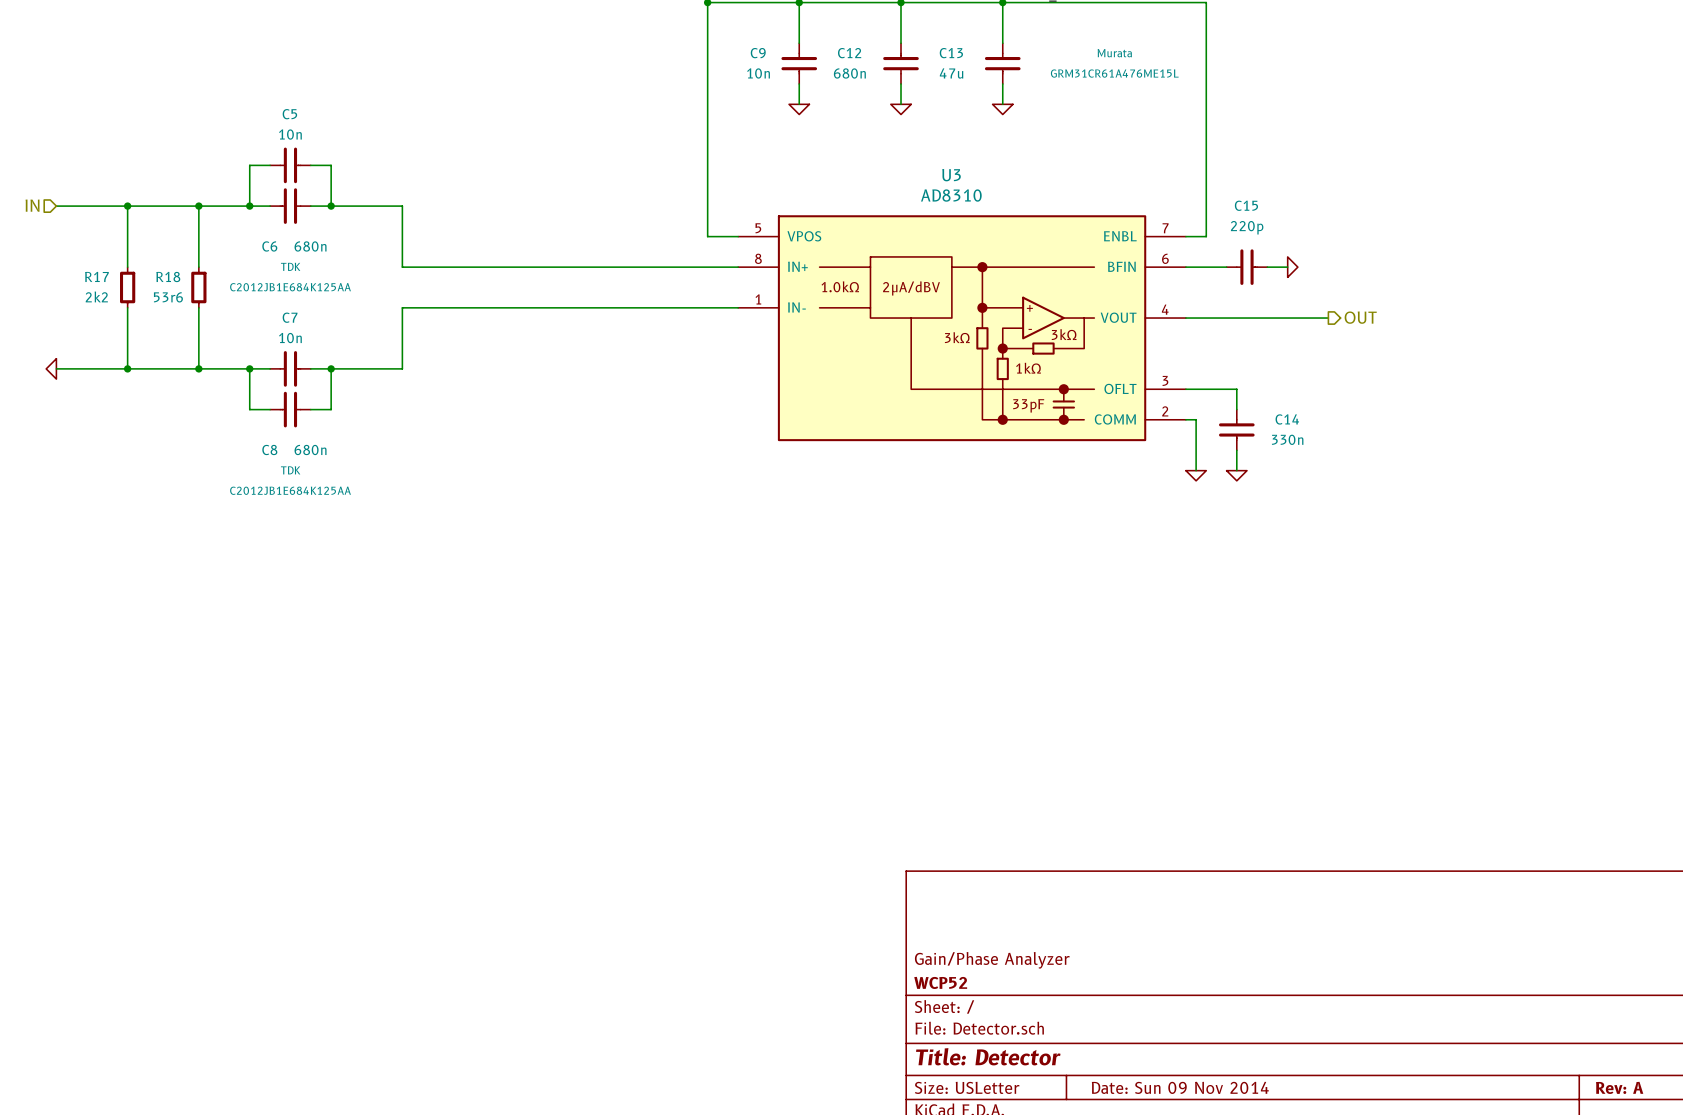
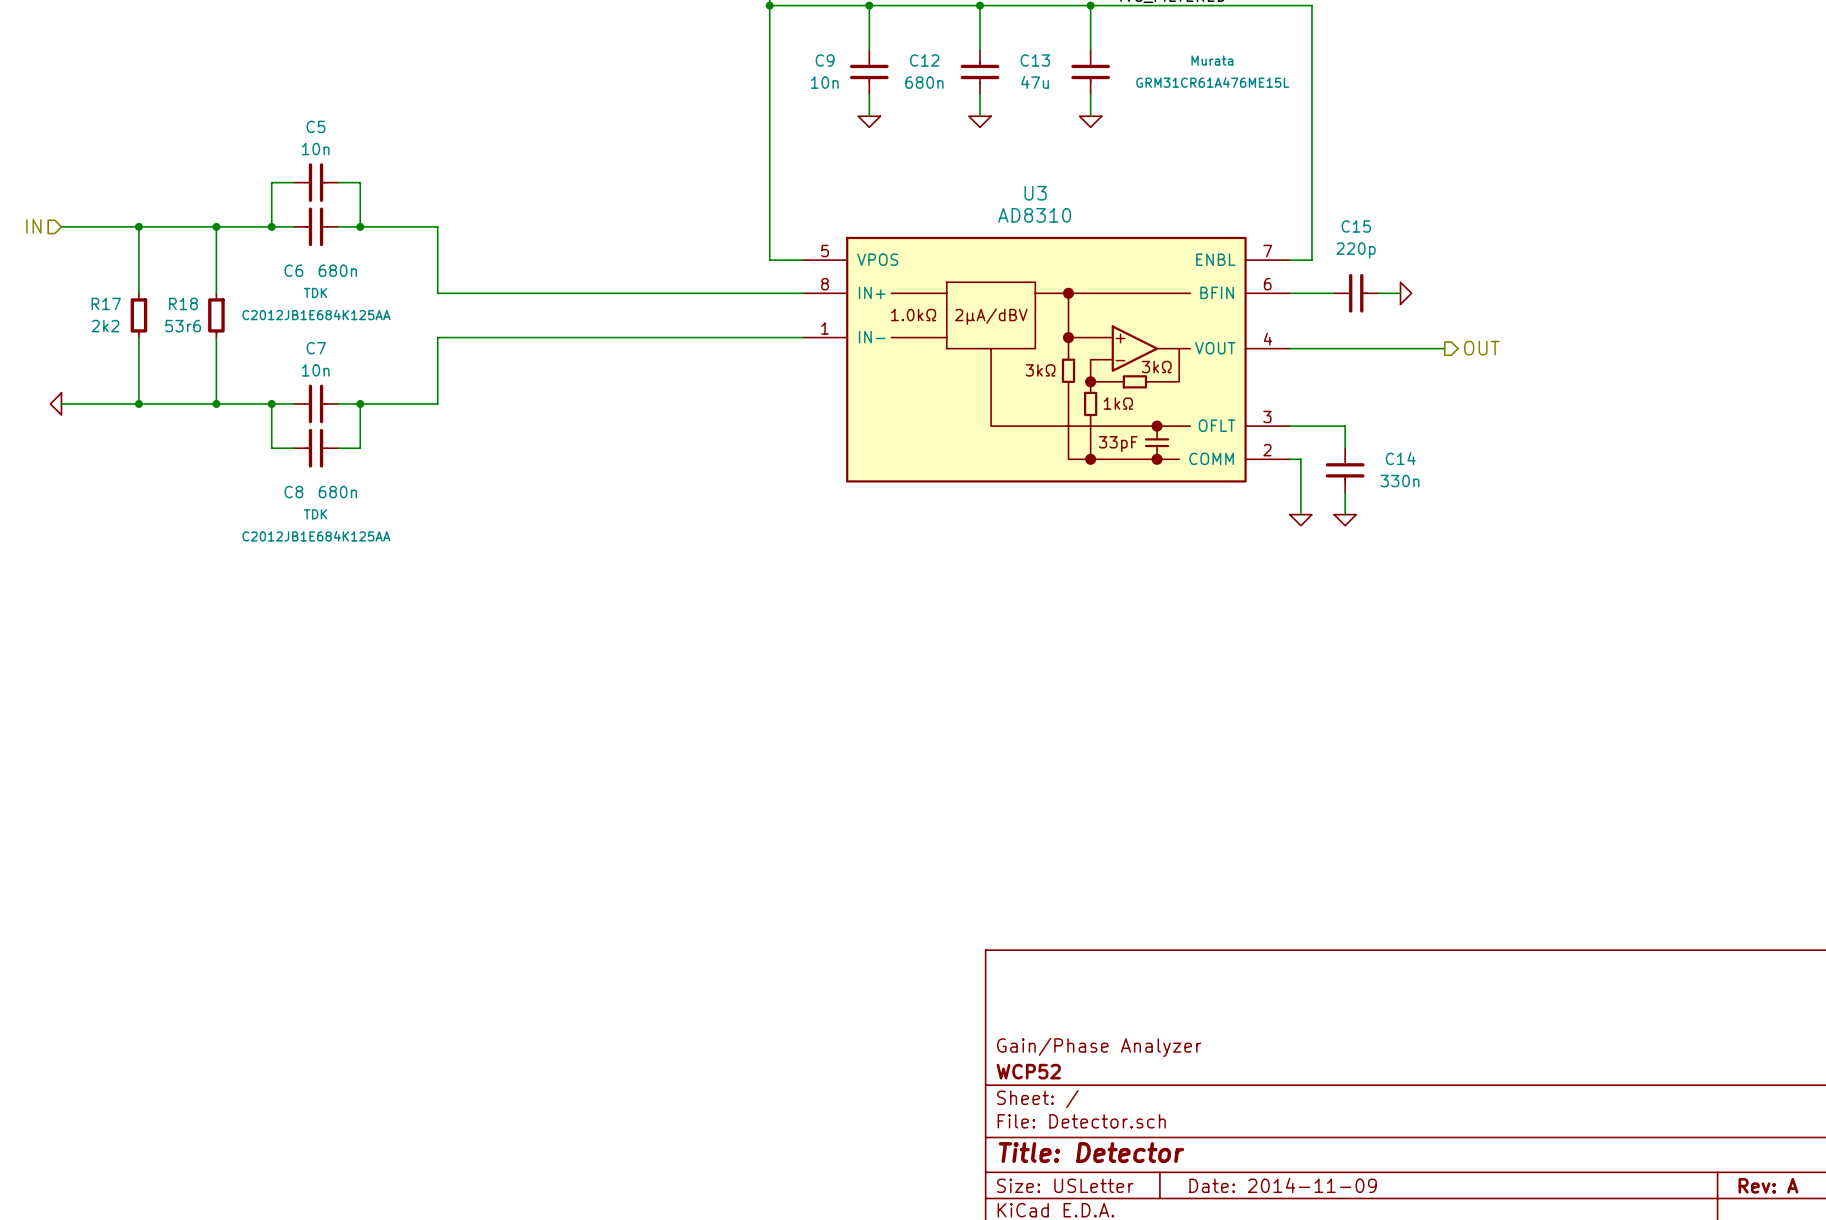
title block: Date: Sun 09 Nov 2014 (1180, 1087) -> Date: 2014-11-09 (1283, 1185)

